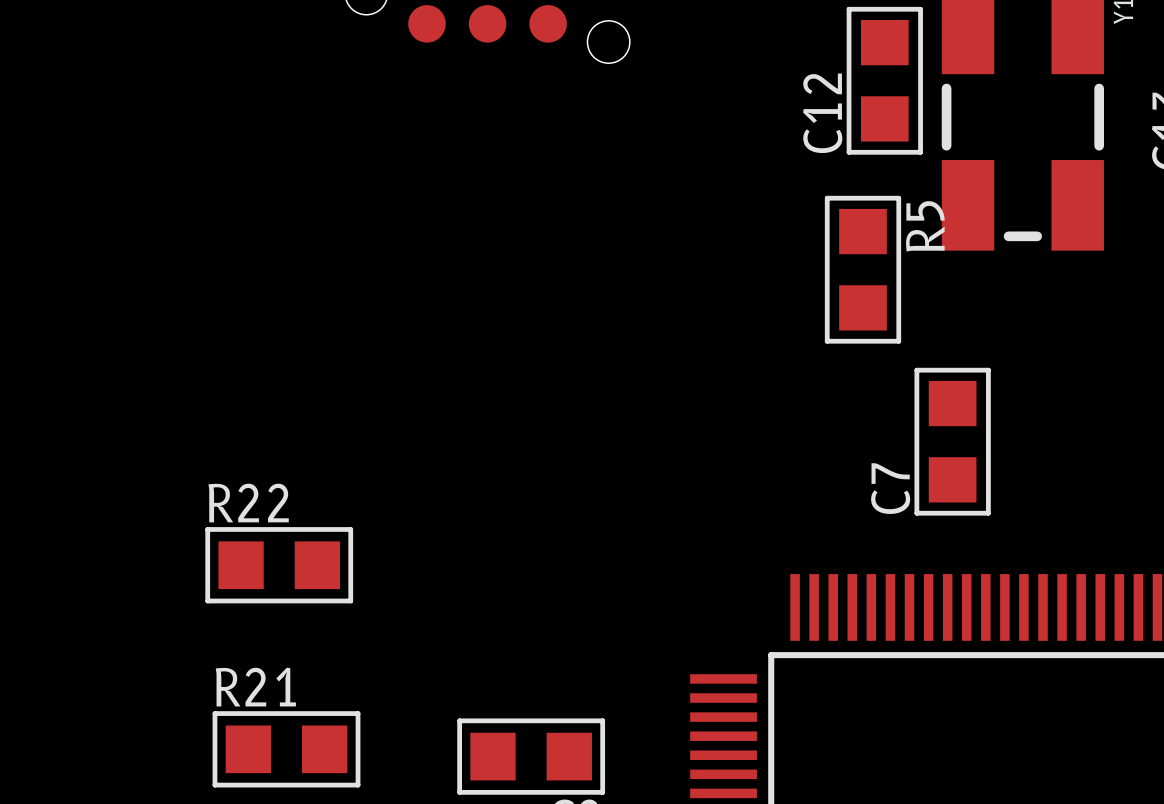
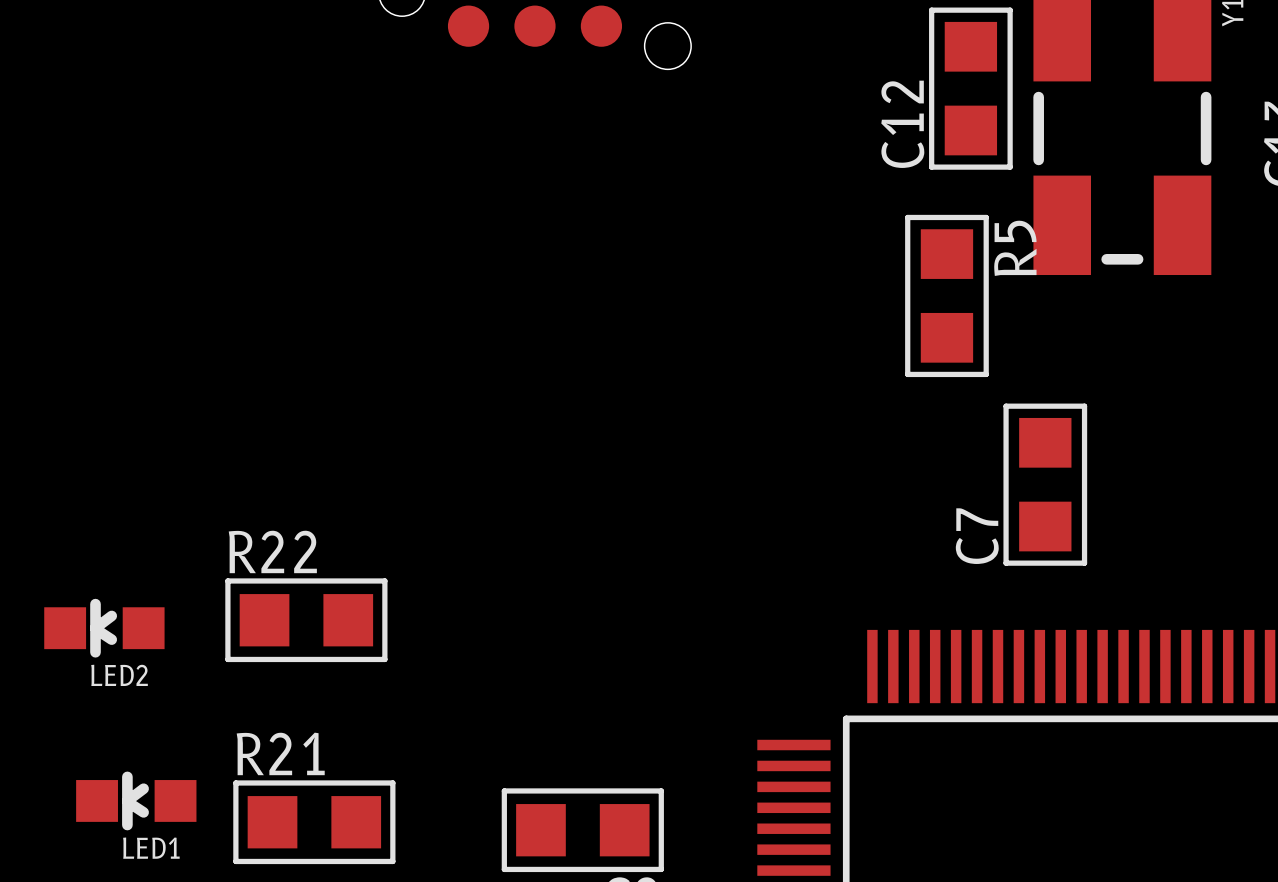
LED2: none -> (104, 628)
LED1: none -> (136, 800)

